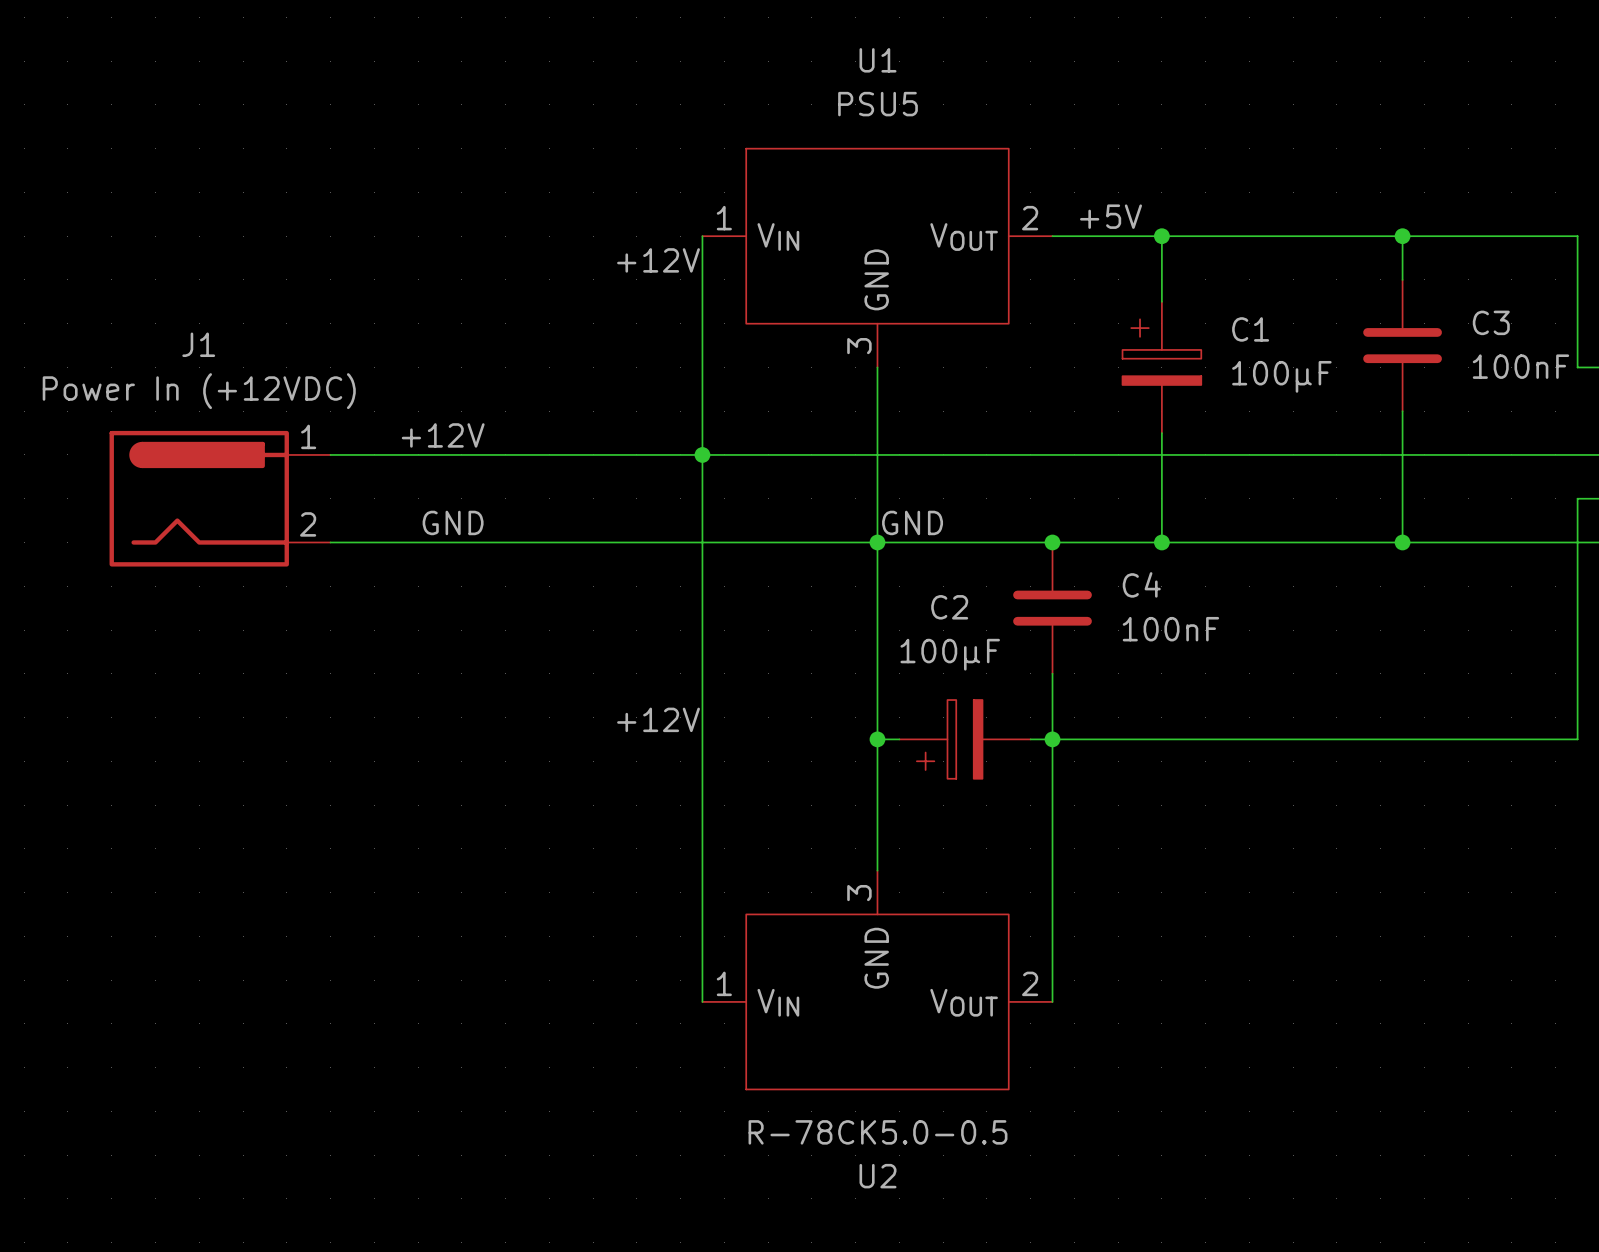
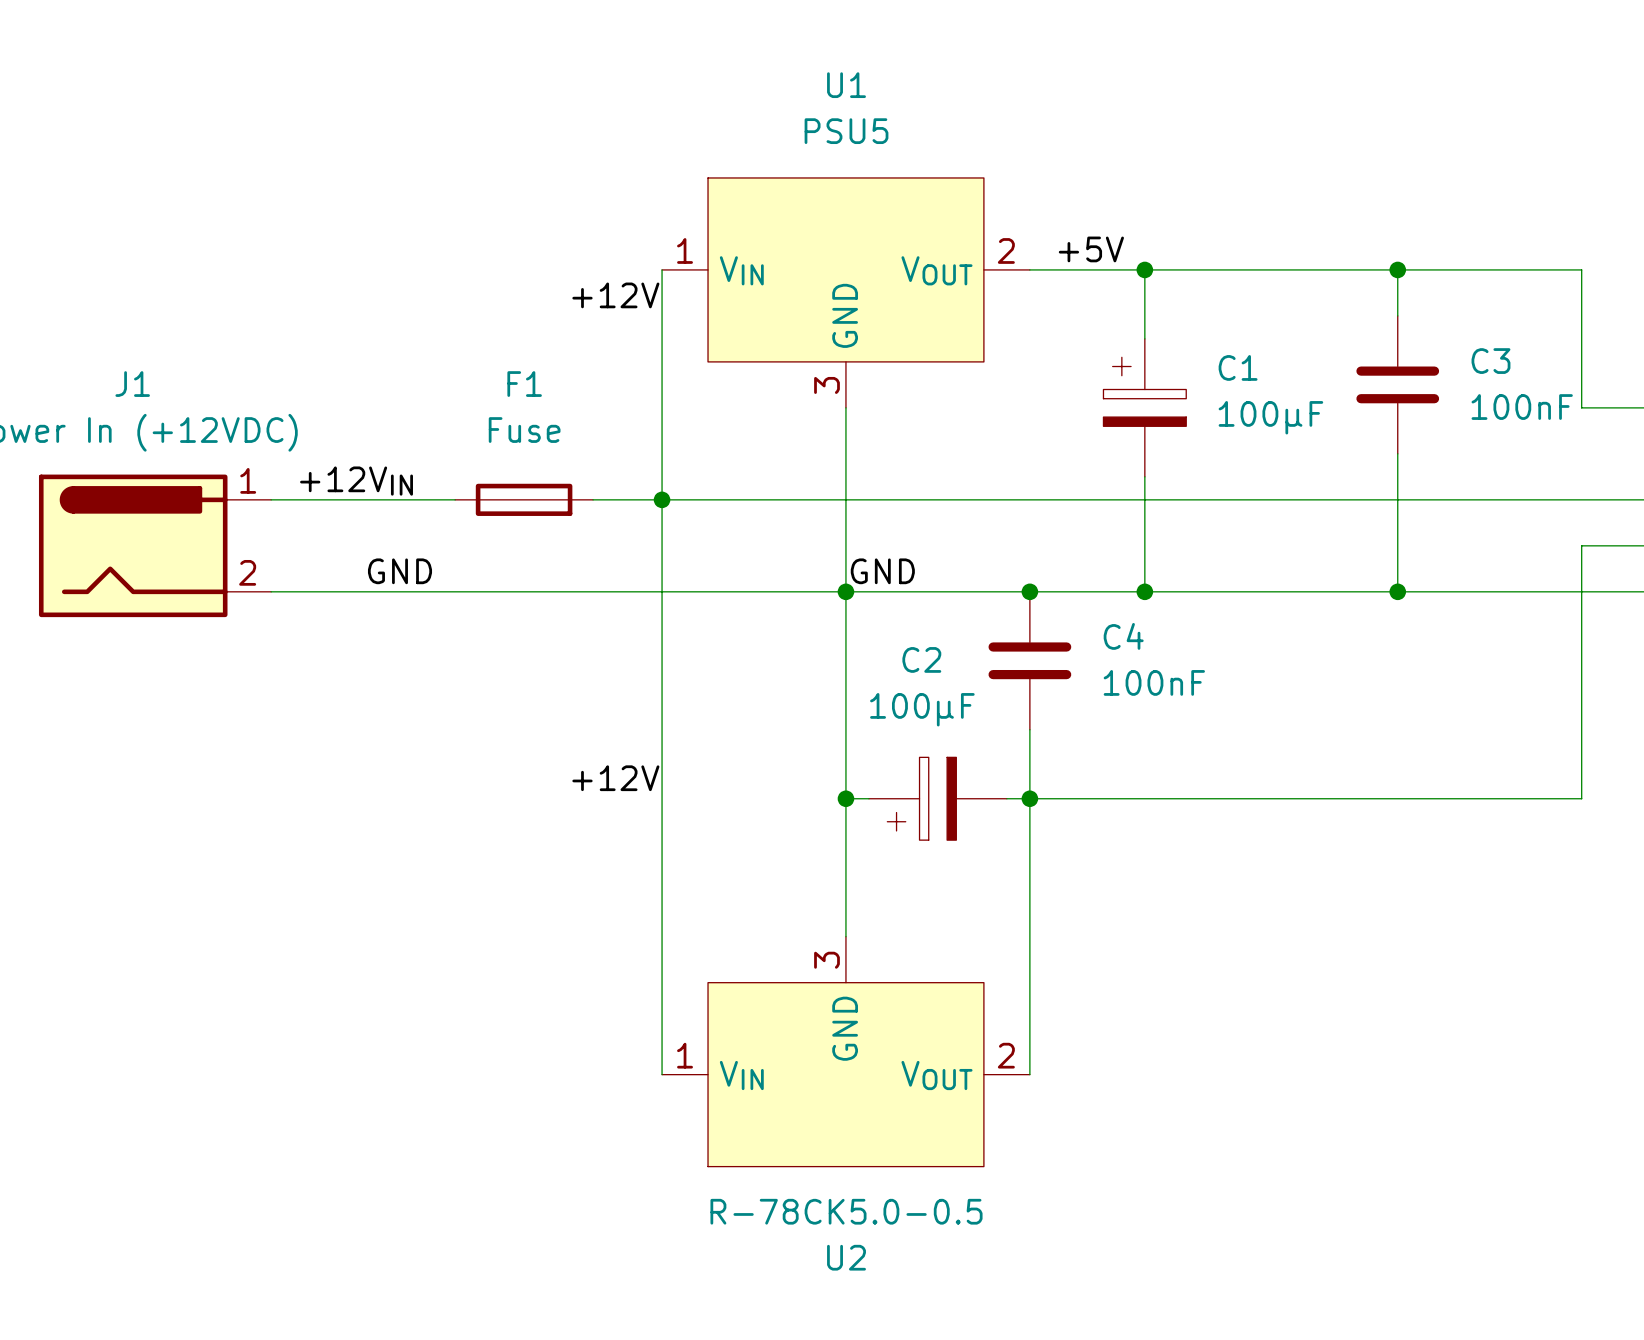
label: +12V (443, 435) -> +12VIN (356, 481)
F1: none -> Fuse (524, 499)

